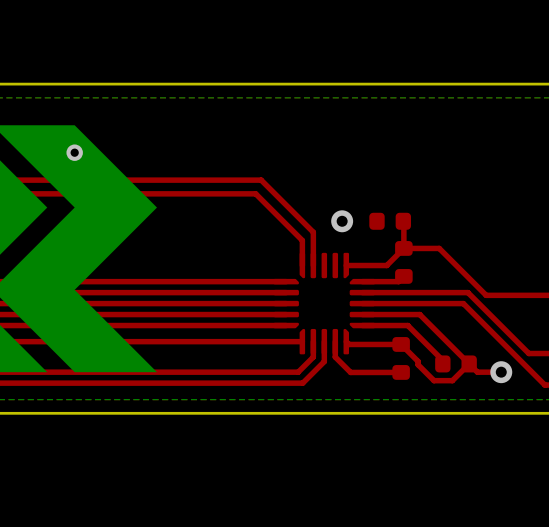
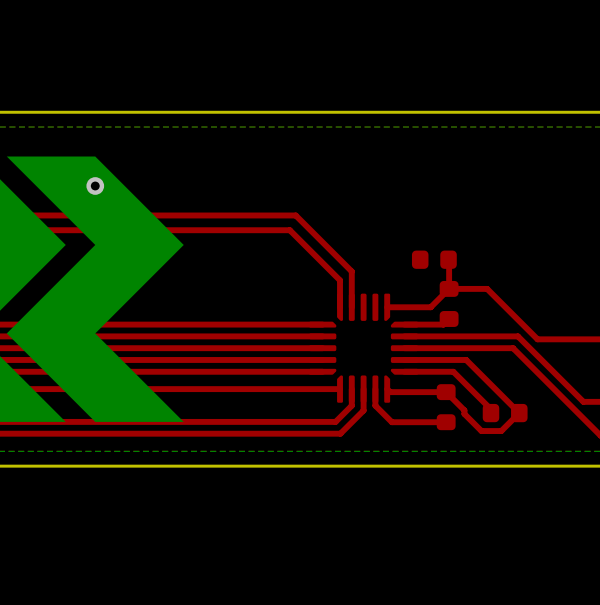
via: (342, 221) -> none
top track: (469, 363) (477, 372) (501, 372) -> none
via: (501, 372) -> none

